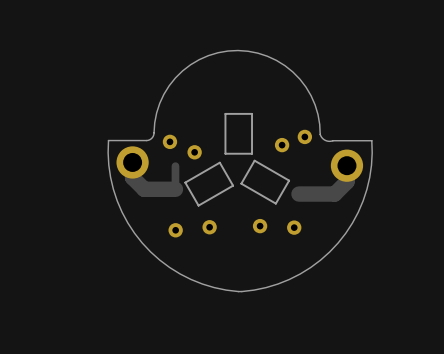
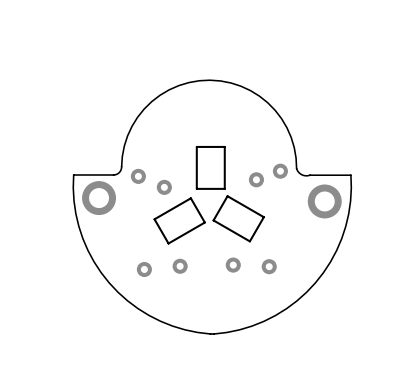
track: (132, 162) (132, 177) (144, 189) (175, 189) (175, 166) -> none
track: (346, 165) (346, 181) (334, 194) (298, 194) -> none

